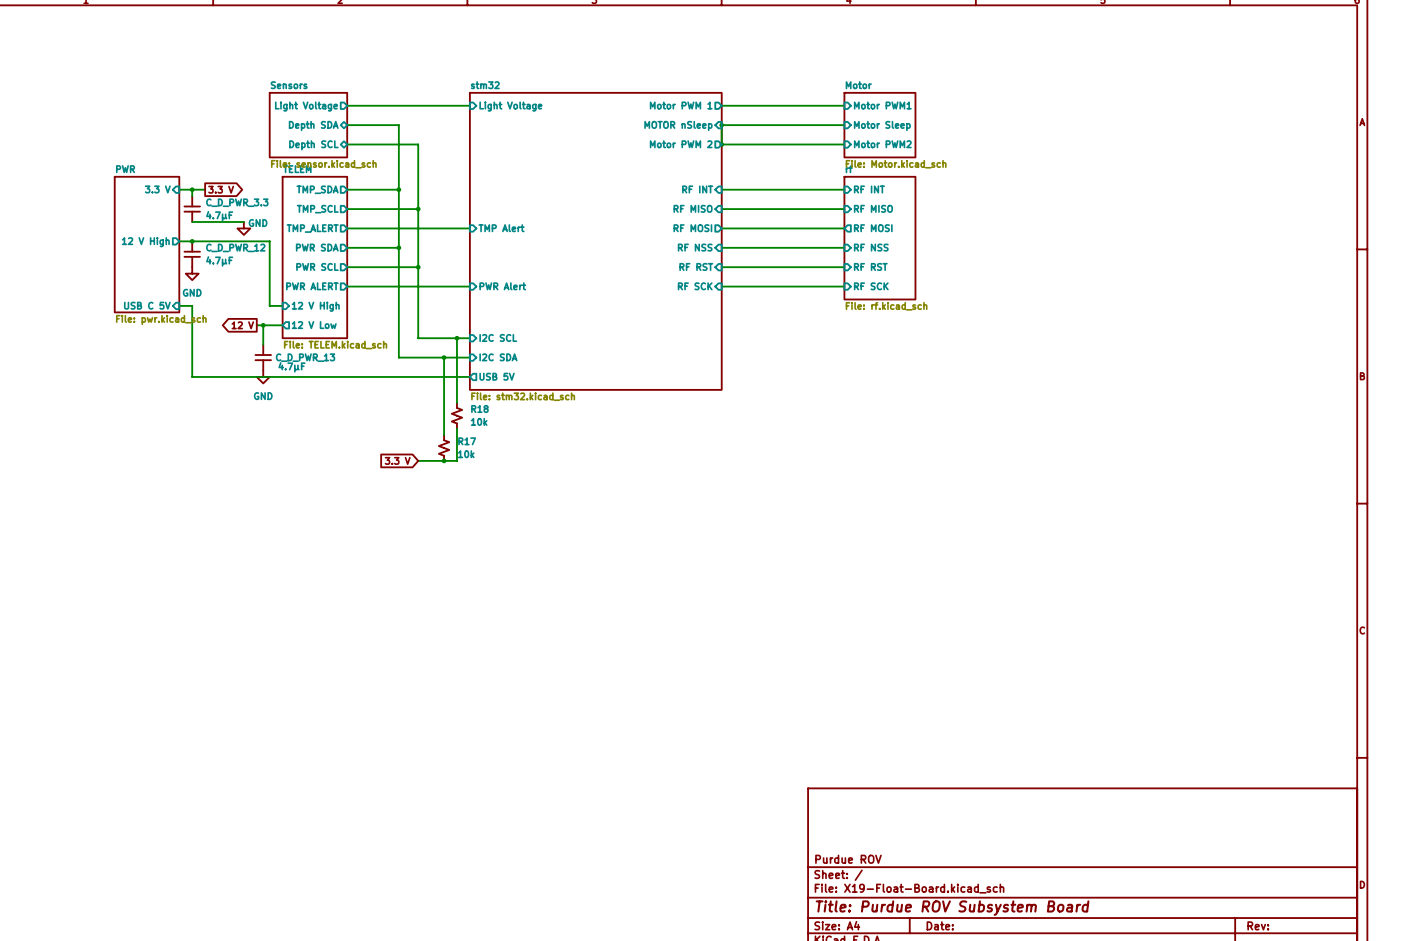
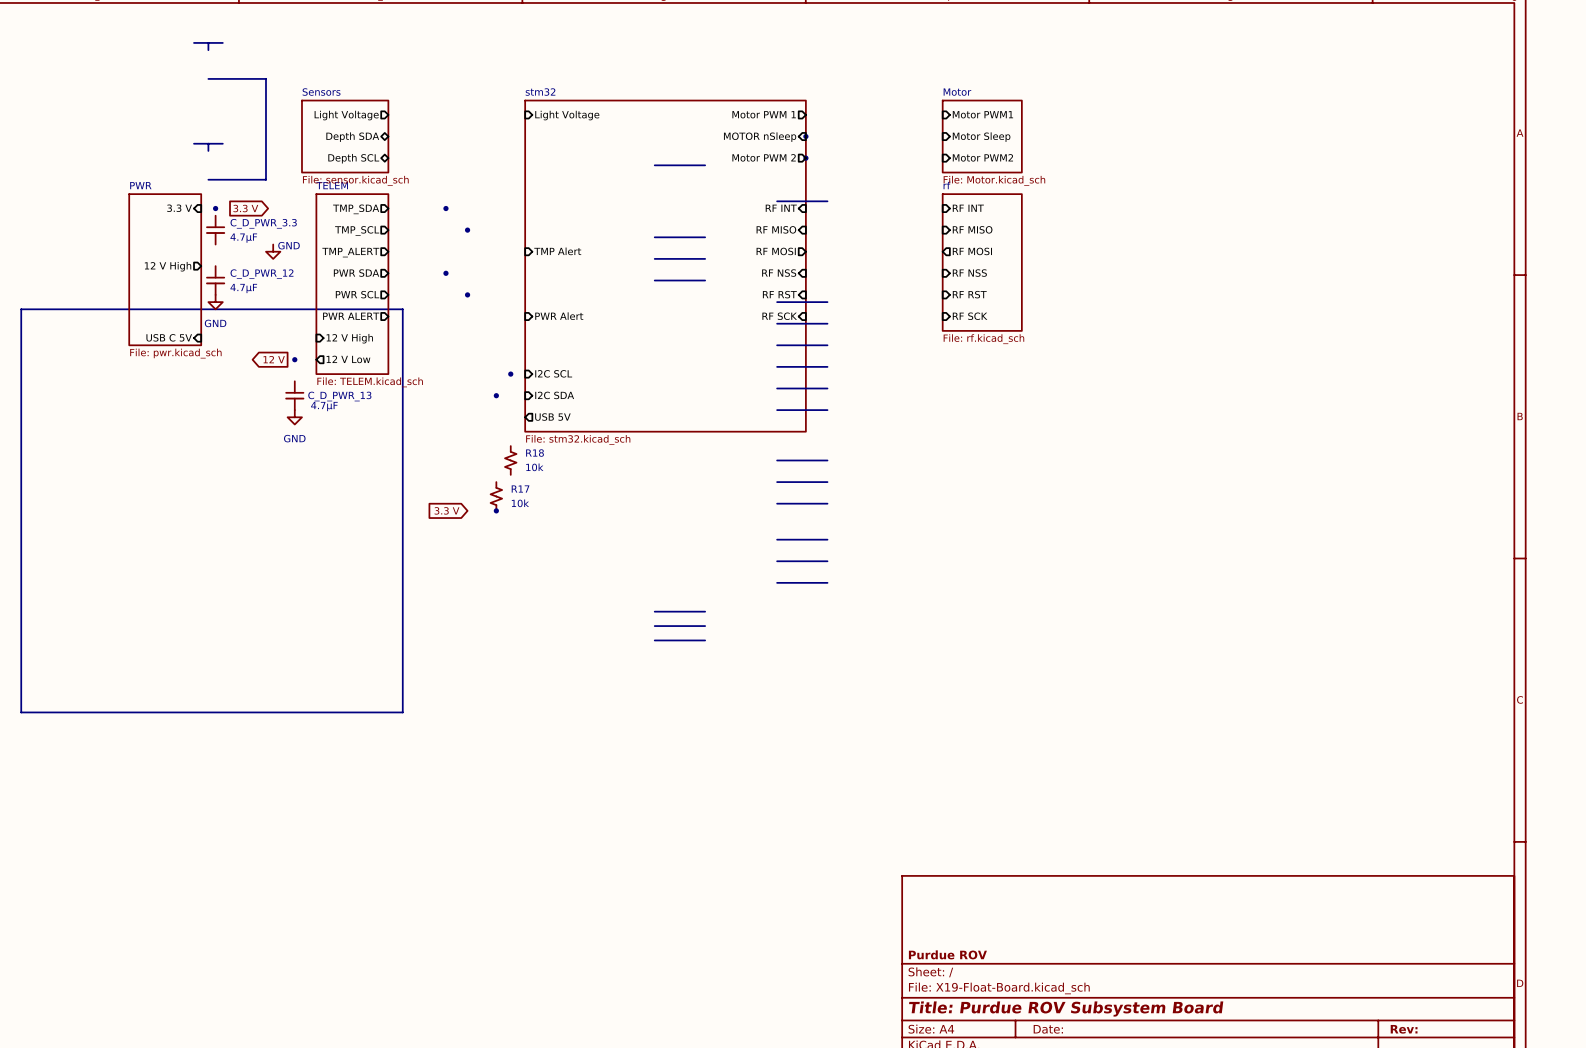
wire: none -> (194, 42) (222, 42)
wire: none -> (208, 42) (208, 50)
wire: none -> (208, 78) (265, 78) (265, 179) (208, 179)
wire: (347, 105) (469, 105) -> none
wire: (721, 105) (844, 105) -> none
wire: (347, 125) (398, 125) (398, 357) (469, 357) -> none
wire: (844, 125) (721, 125) (721, 144) (844, 144) -> none
wire: (347, 144) (418, 144) (418, 338) (469, 338) -> none
wire: none -> (654, 165) (705, 165)
wire: none -> (777, 201) (827, 201)
wire: (179, 189) (205, 189) -> (194, 143) (222, 143)
wire: (192, 189) (192, 196) -> (208, 143) (208, 150)
wire: (347, 189) (398, 189) -> none
wire: (721, 189) (844, 189) -> none
wire: (347, 209) (418, 209) -> none
wire: (721, 209) (844, 209) -> none
wire: none -> (654, 237) (705, 237)
wire: (192, 221) (243, 221) -> none
wire: (347, 228) (469, 228) -> none
wire: (721, 228) (844, 228) -> none
wire: none -> (654, 258) (705, 258)
wire: (179, 241) (269, 241) (269, 305) (282, 305) -> none
junction: (192, 241) -> none
wire: (347, 247) (398, 247) -> none
wire: (721, 247) (844, 247) -> none
wire: none -> (654, 280) (705, 280)
wire: (347, 267) (418, 267) -> none
wire: (721, 267) (844, 267) -> none
wire: none -> (777, 302) (827, 302)
line: none -> (21, 309) (402, 309) (402, 712) (21, 712) (21, 309)
wire: (347, 286) (469, 286) -> none
wire: (721, 286) (844, 286) -> none
wire: none -> (777, 323) (827, 323)
wire: (179, 305) (192, 305) (192, 376) (469, 376) -> none
wire: none -> (777, 345) (827, 345)
wire: (256, 325) (282, 325) -> none
wire: (263, 325) (263, 344) -> none
wire: none -> (777, 366) (827, 366)
wire: (456, 338) (456, 402) -> none
wire: none -> (777, 388) (827, 388)
wire: (444, 357) (444, 435) -> none
wire: none -> (777, 410) (827, 410)
wire: none -> (777, 460) (827, 460)
wire: (456, 428) (456, 460) (418, 460) -> none
wire: none -> (777, 482) (827, 482)
wire: none -> (777, 503) (827, 503)
wire: none -> (777, 539) (827, 539)
wire: none -> (777, 561) (827, 561)
wire: none -> (777, 582) (827, 582)
wire: none -> (654, 611) (705, 611)
wire: none -> (654, 626) (705, 626)
wire: none -> (654, 640) (705, 640)

